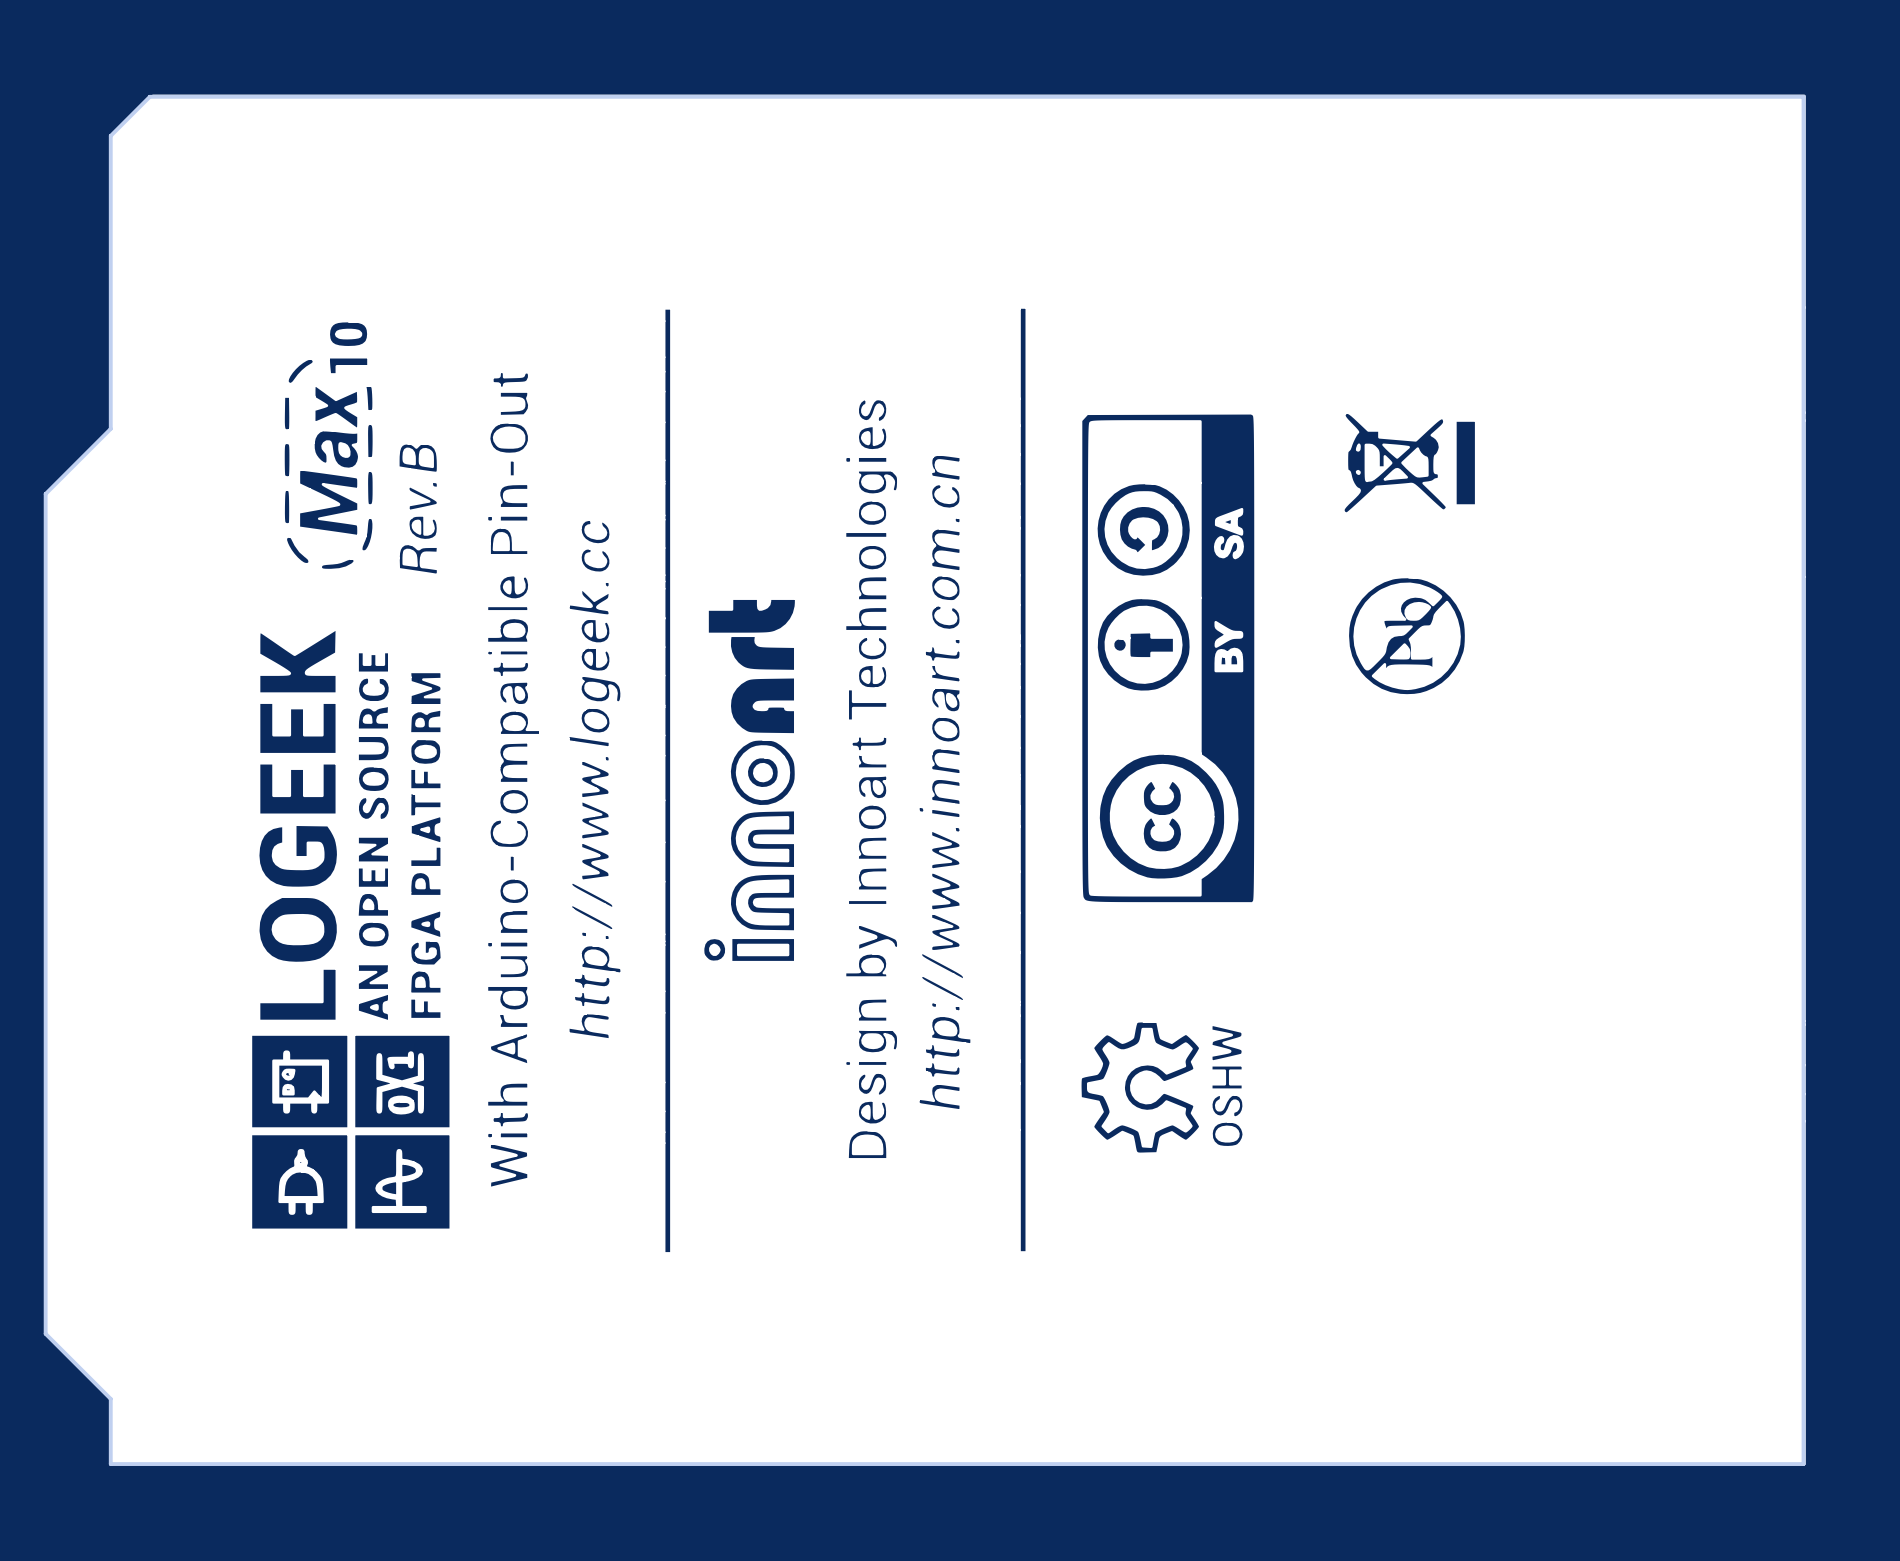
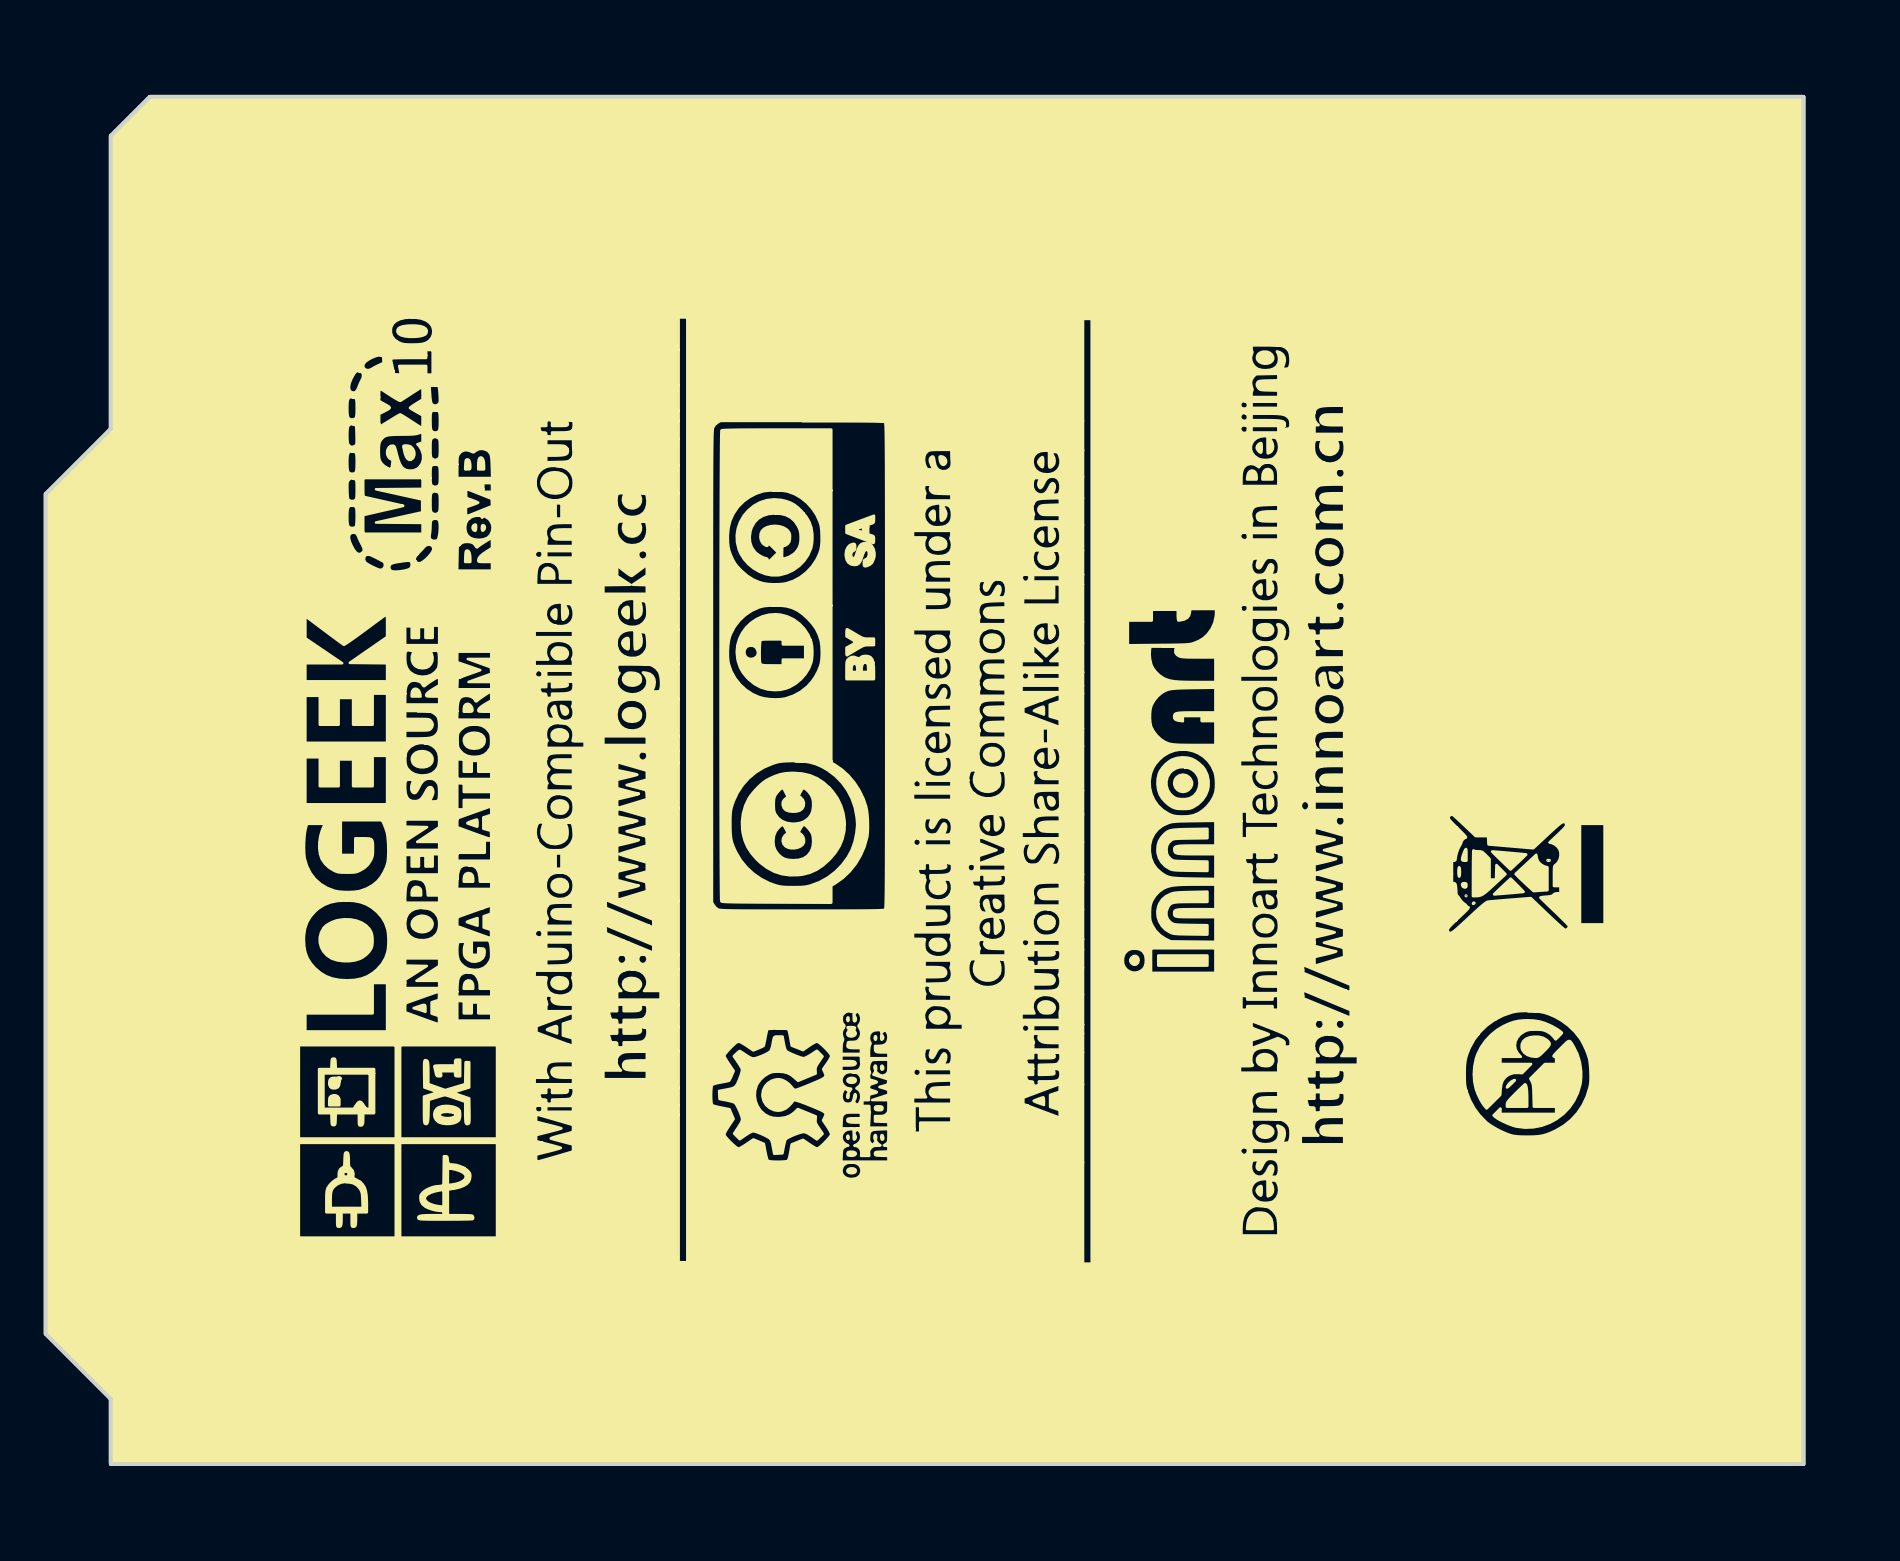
drawing: none -> [43, 94, 1806, 1467]
drawing: [44, 94, 1806, 1466] -> none

